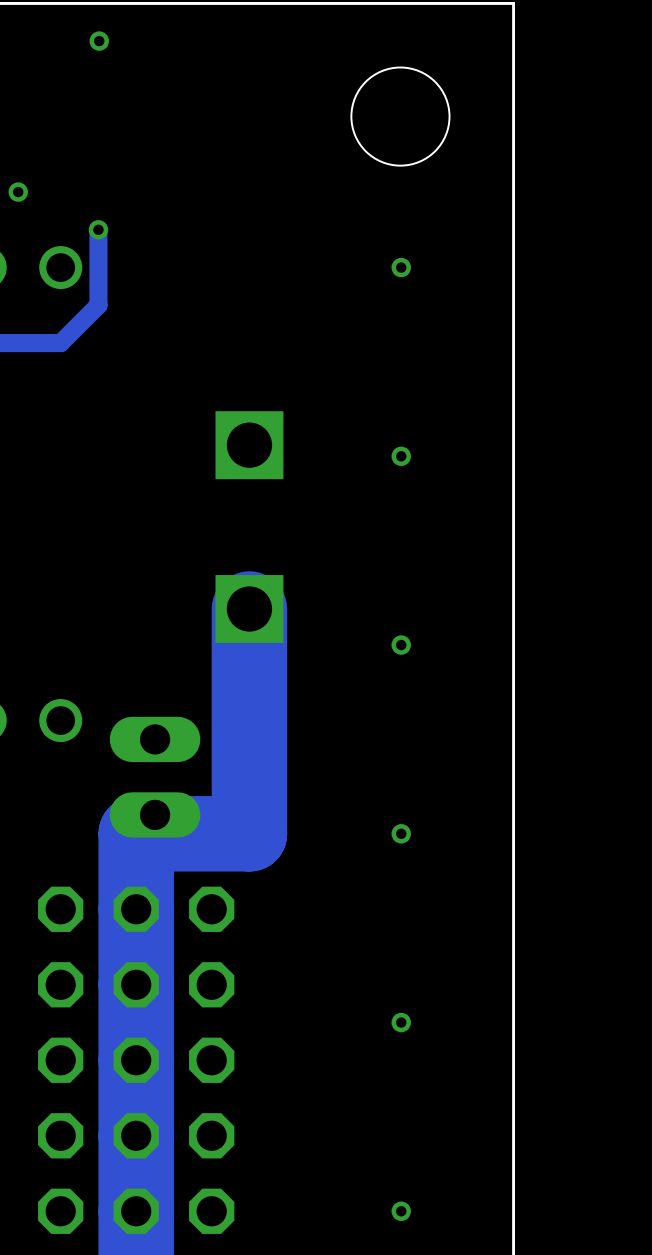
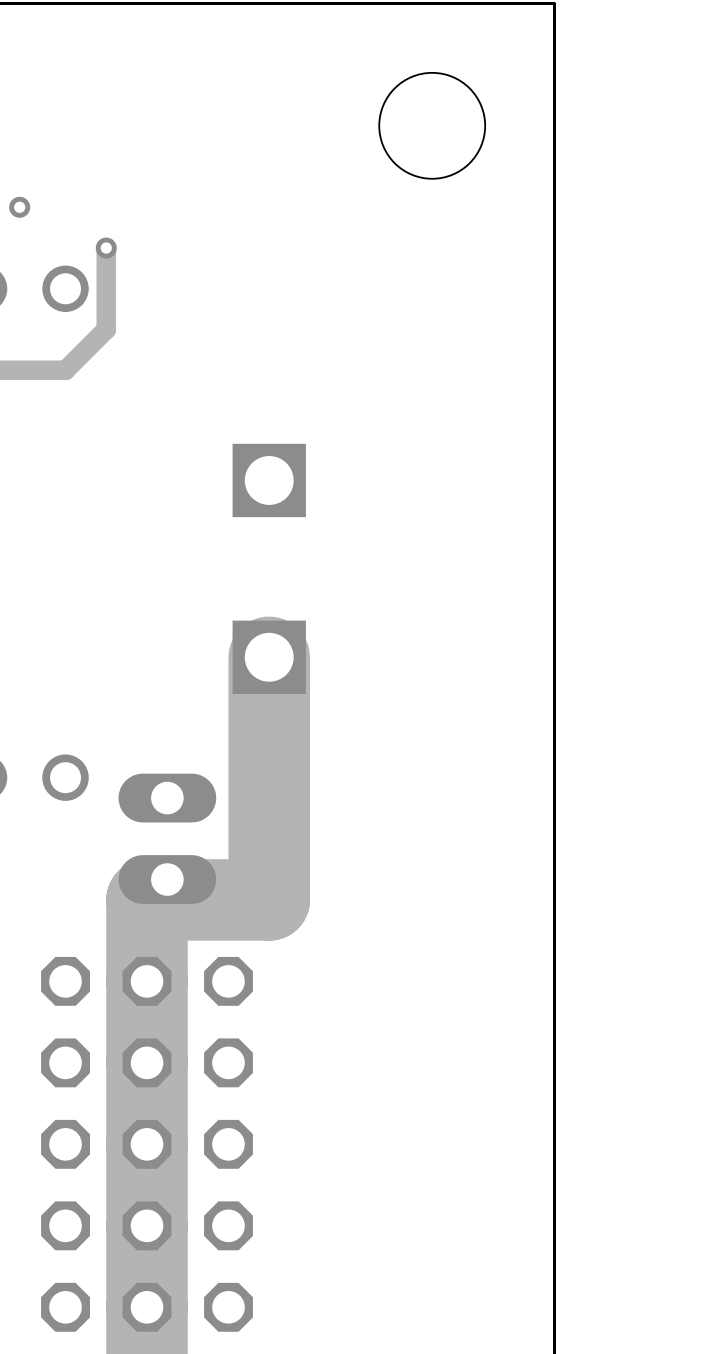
via: (99, 41) -> none
via: (401, 267) -> none
via: (401, 456) -> none
via: (401, 645) -> none
via: (401, 833) -> none
via: (401, 1022) -> none
via: (401, 1211) -> none

